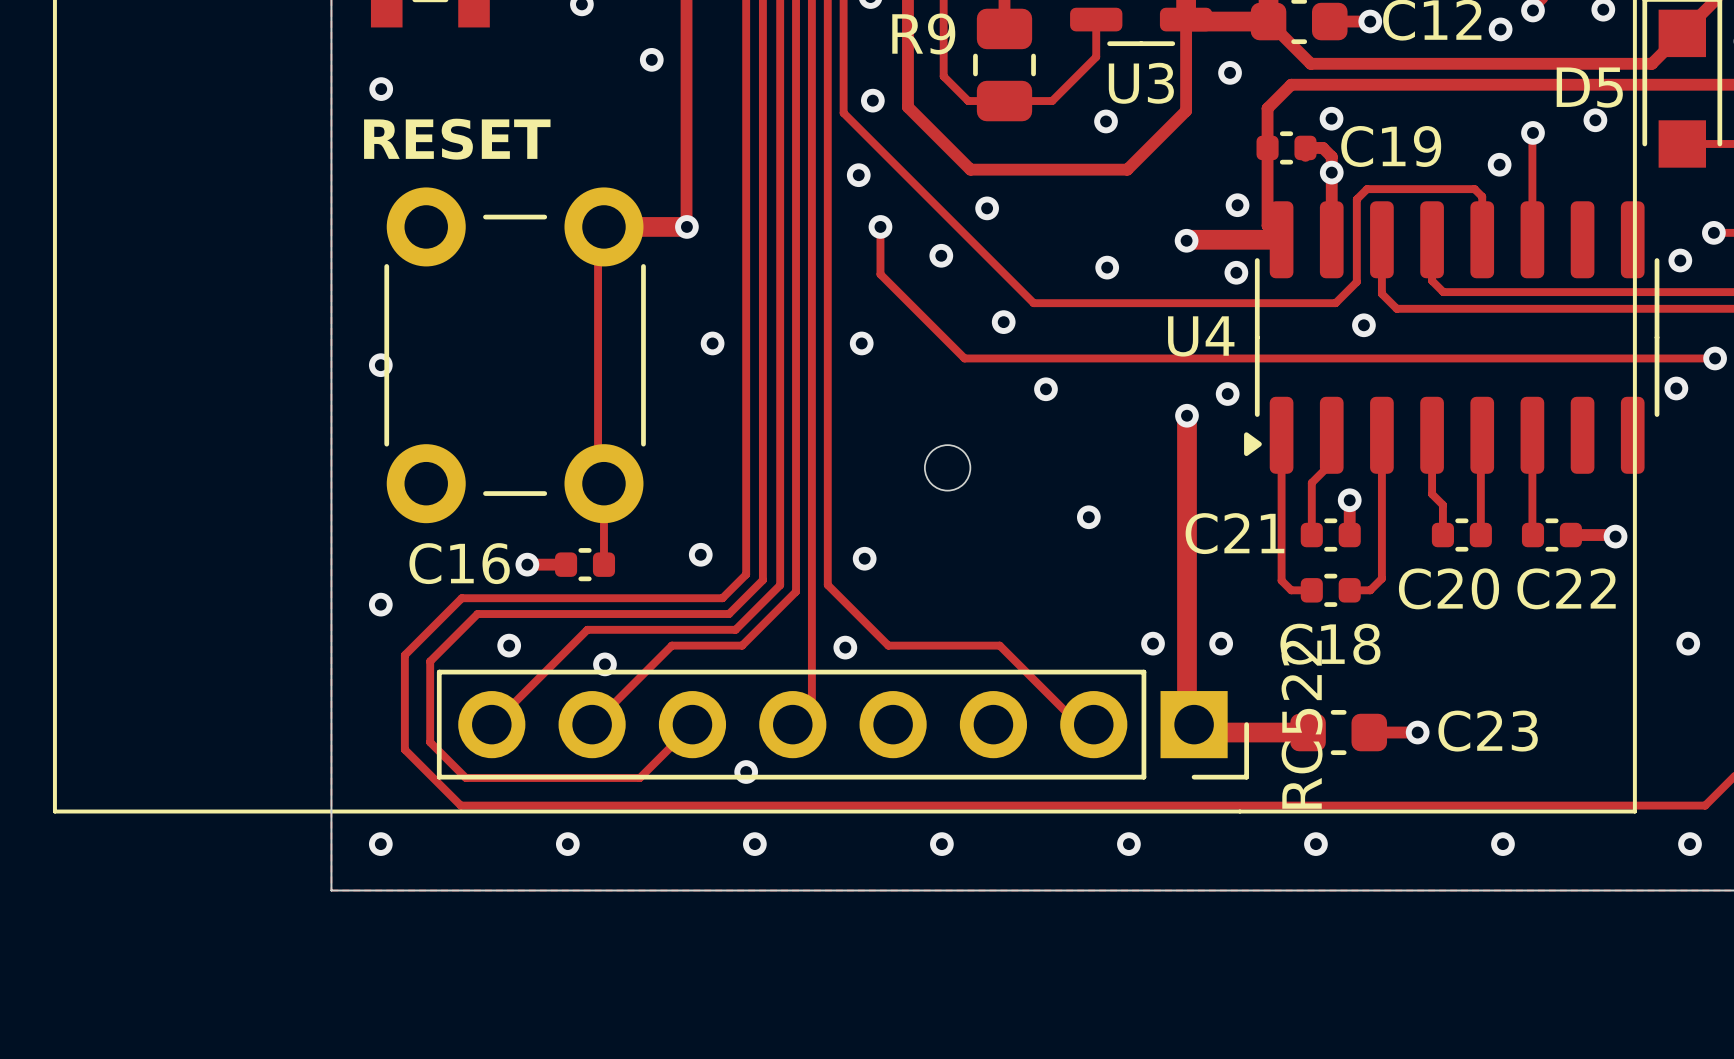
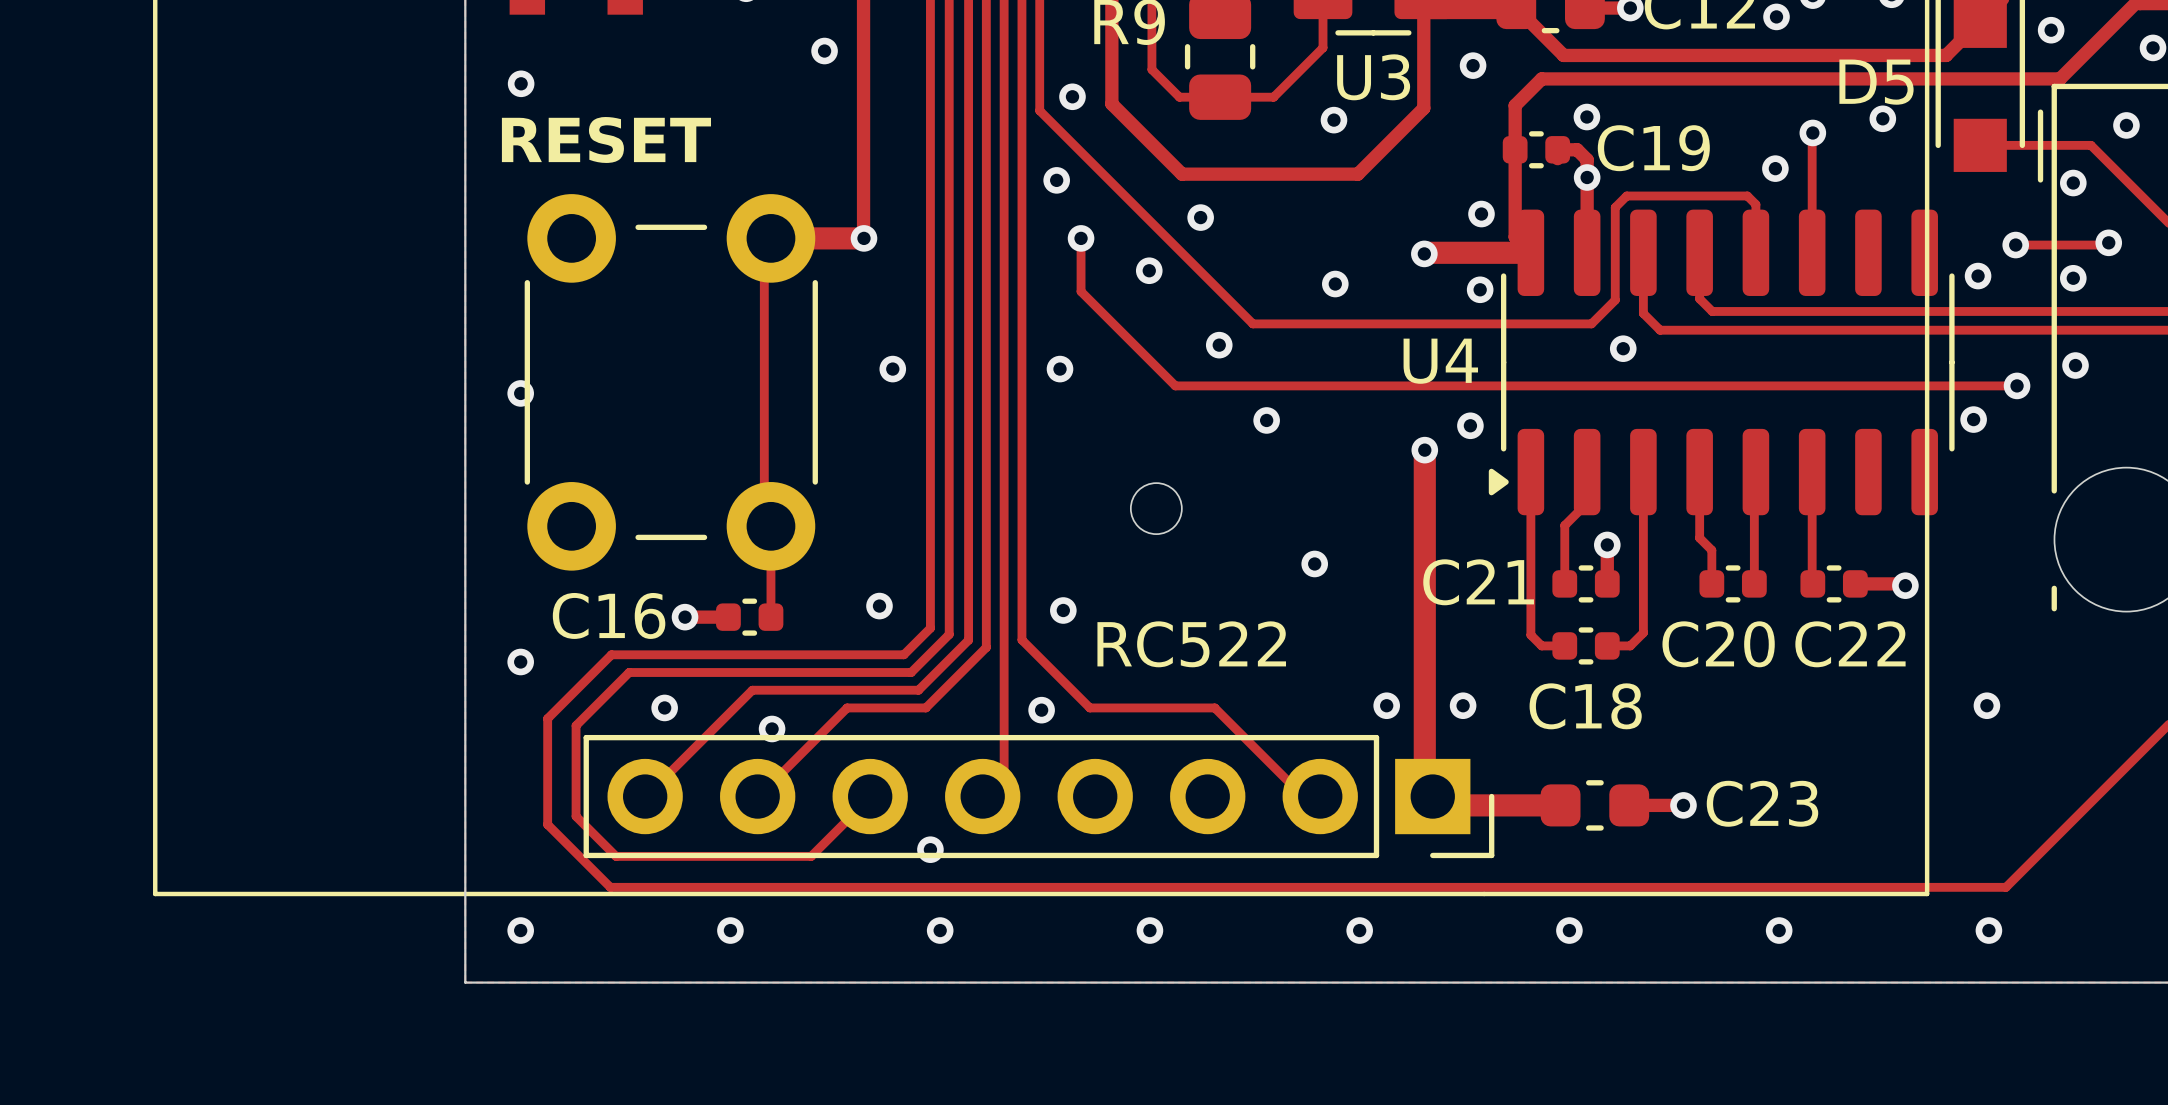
RC522 name rotation: 0° (1302, 724) -> 90° clockwise (1191, 644)
RC522 name position: RC522 (1302, 724) -> RC522 (1191, 644)

